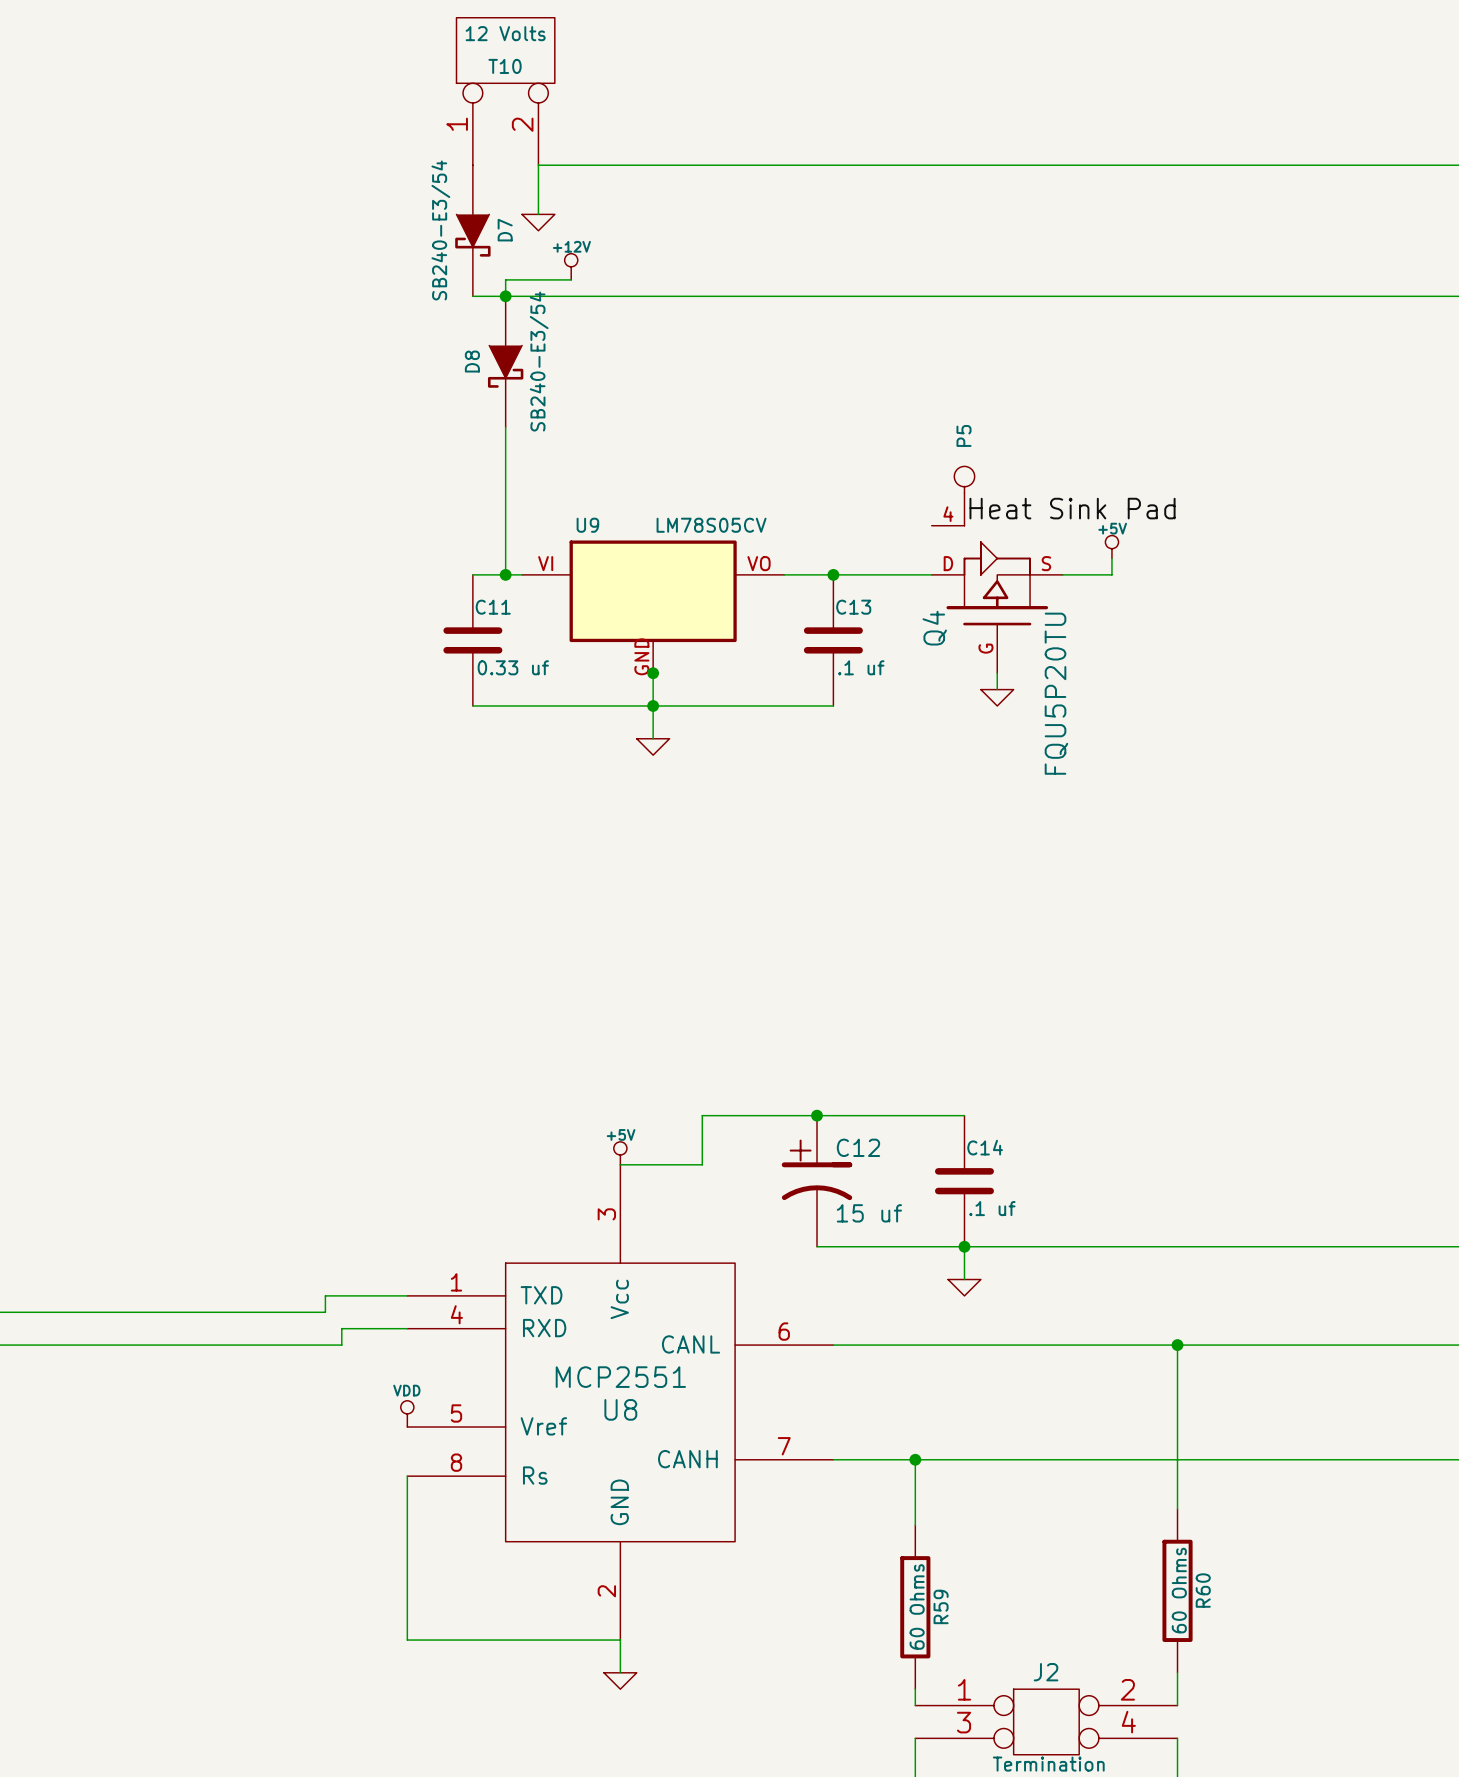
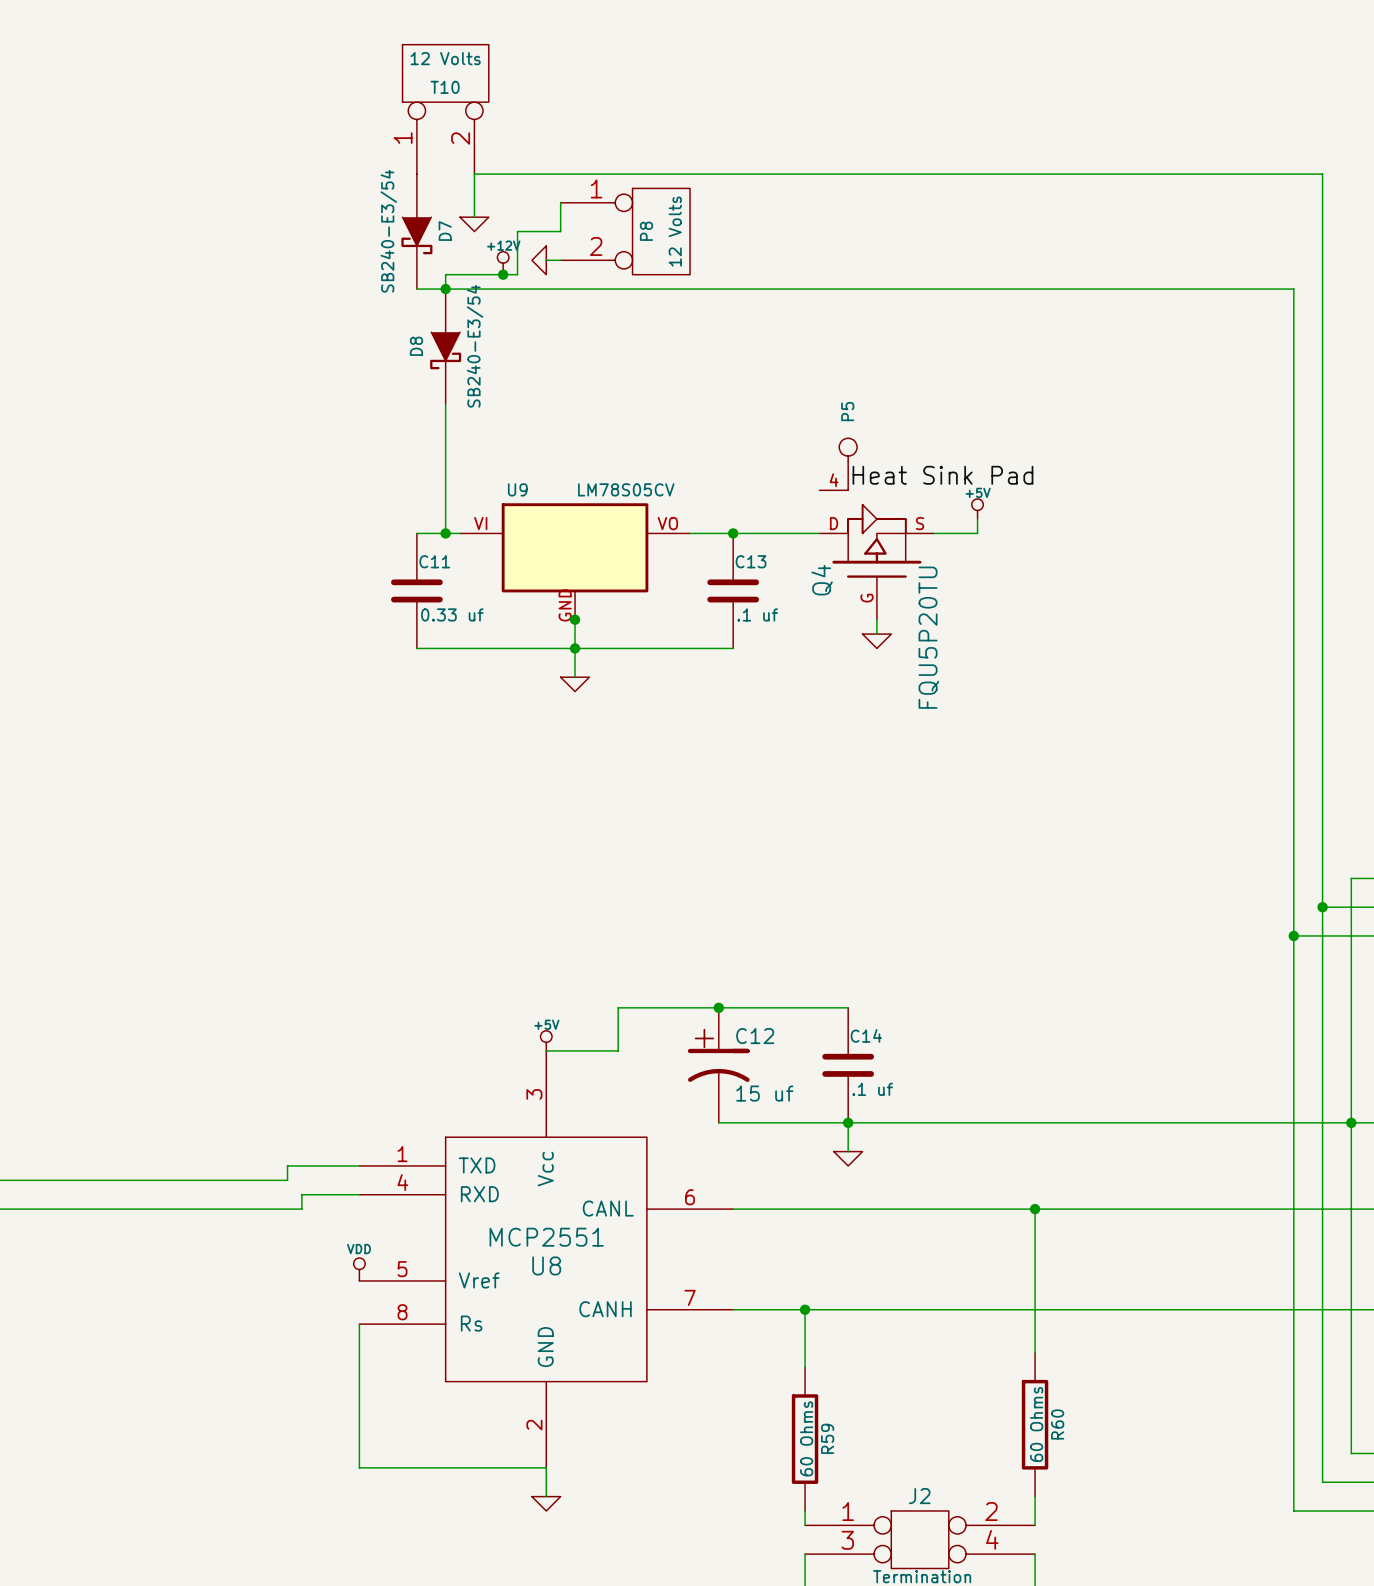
wire: none -> (560, 202) (560, 231) (517, 231) (517, 274) (503, 274)
P8: none -> 12 Volts (625, 231)
power symbol: none -> (539, 260)
wire: none -> (546, 260) (560, 260)
junction: none -> (503, 274)

